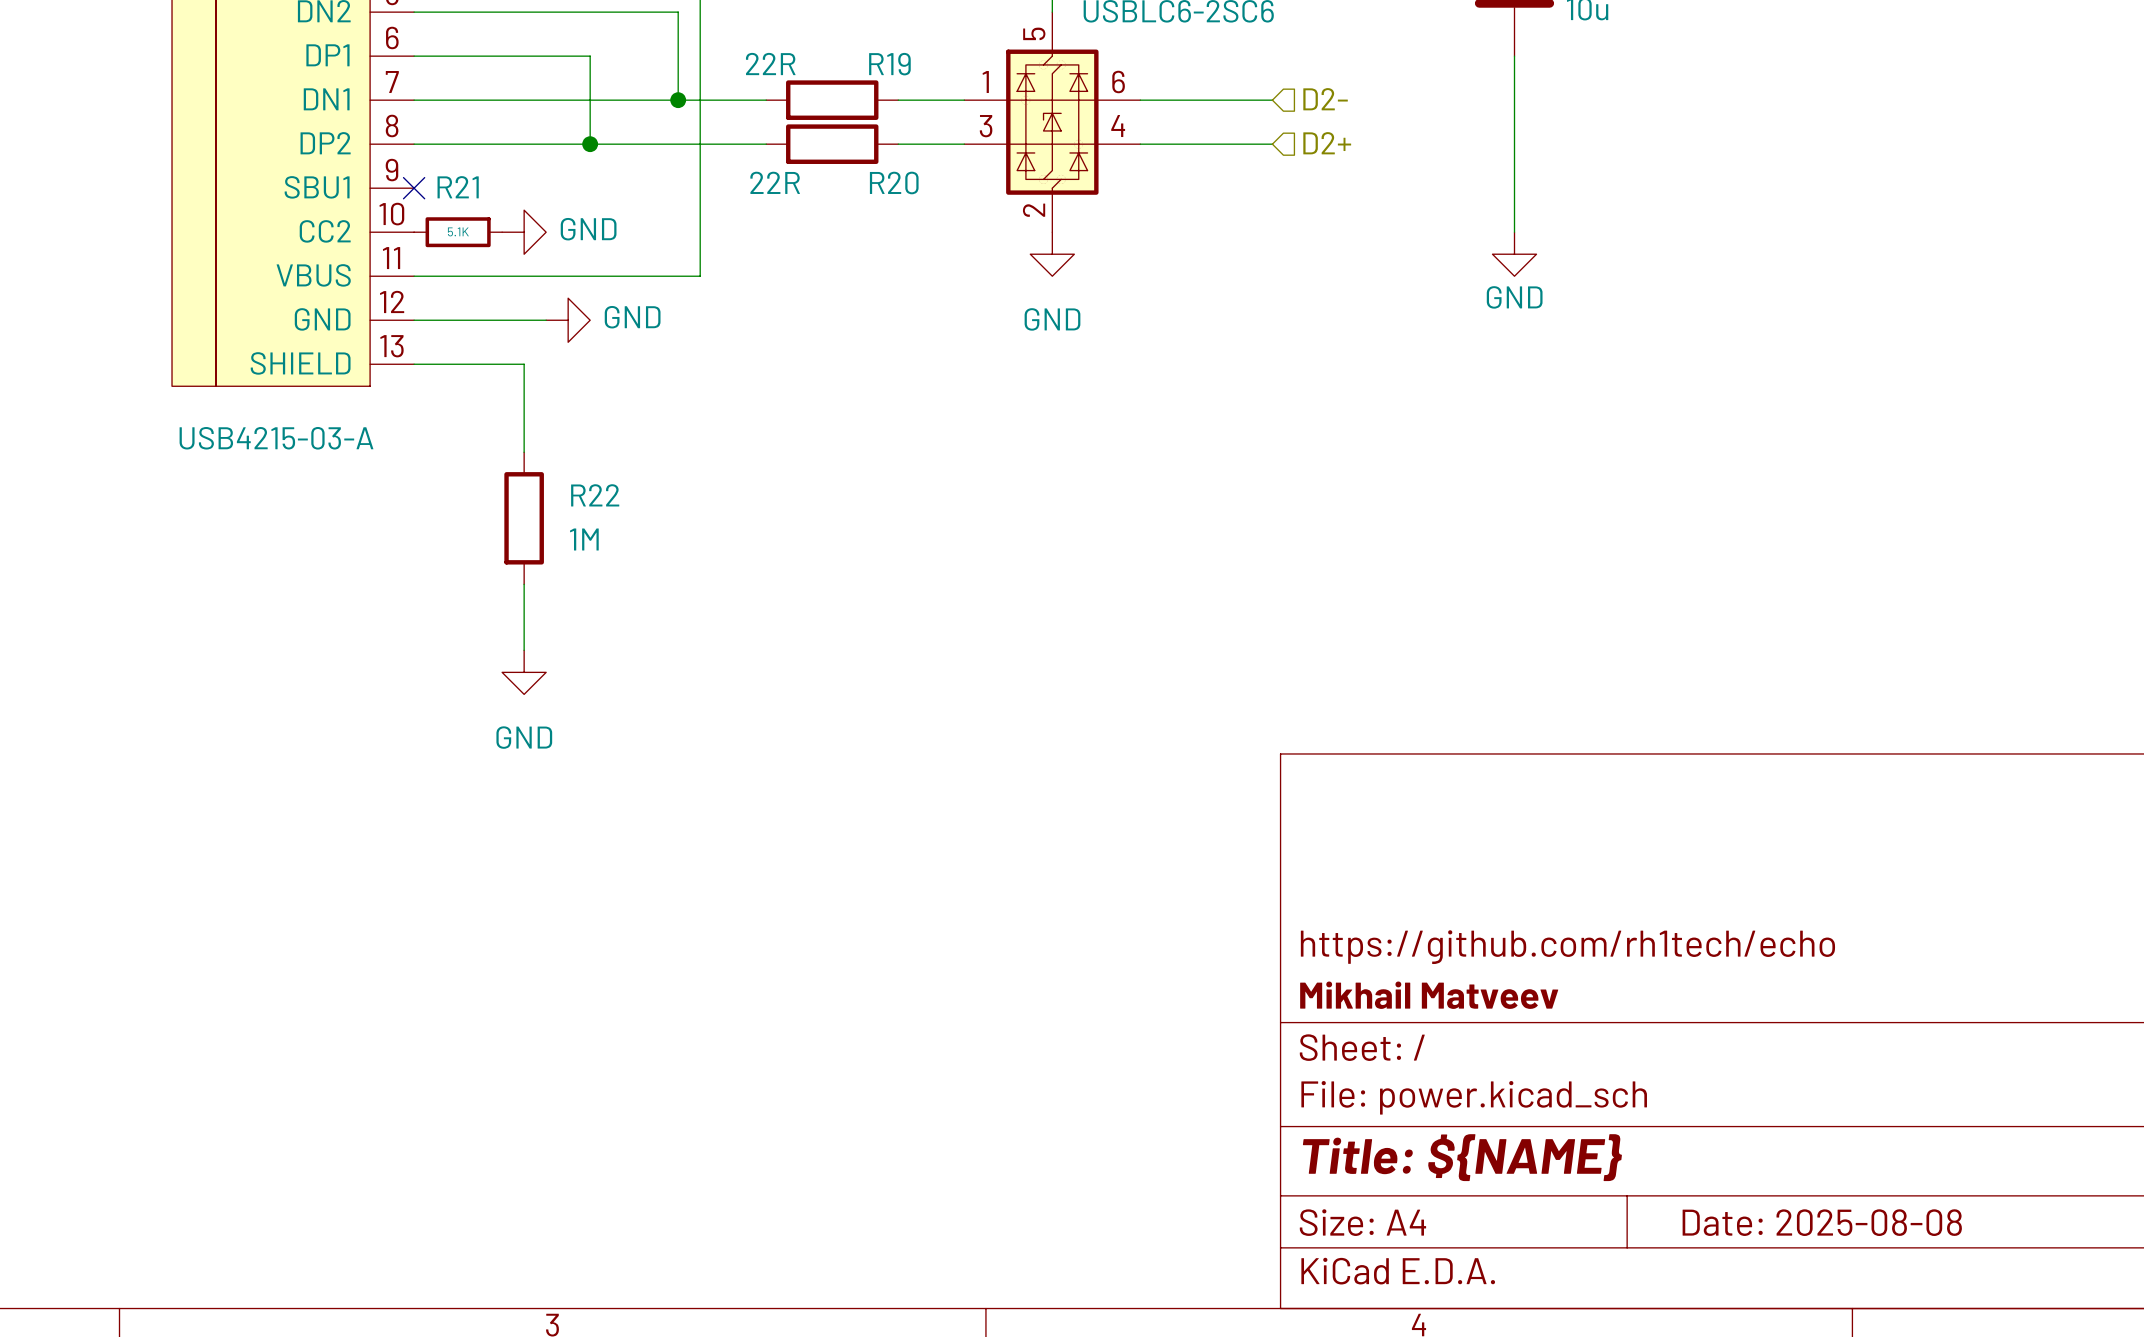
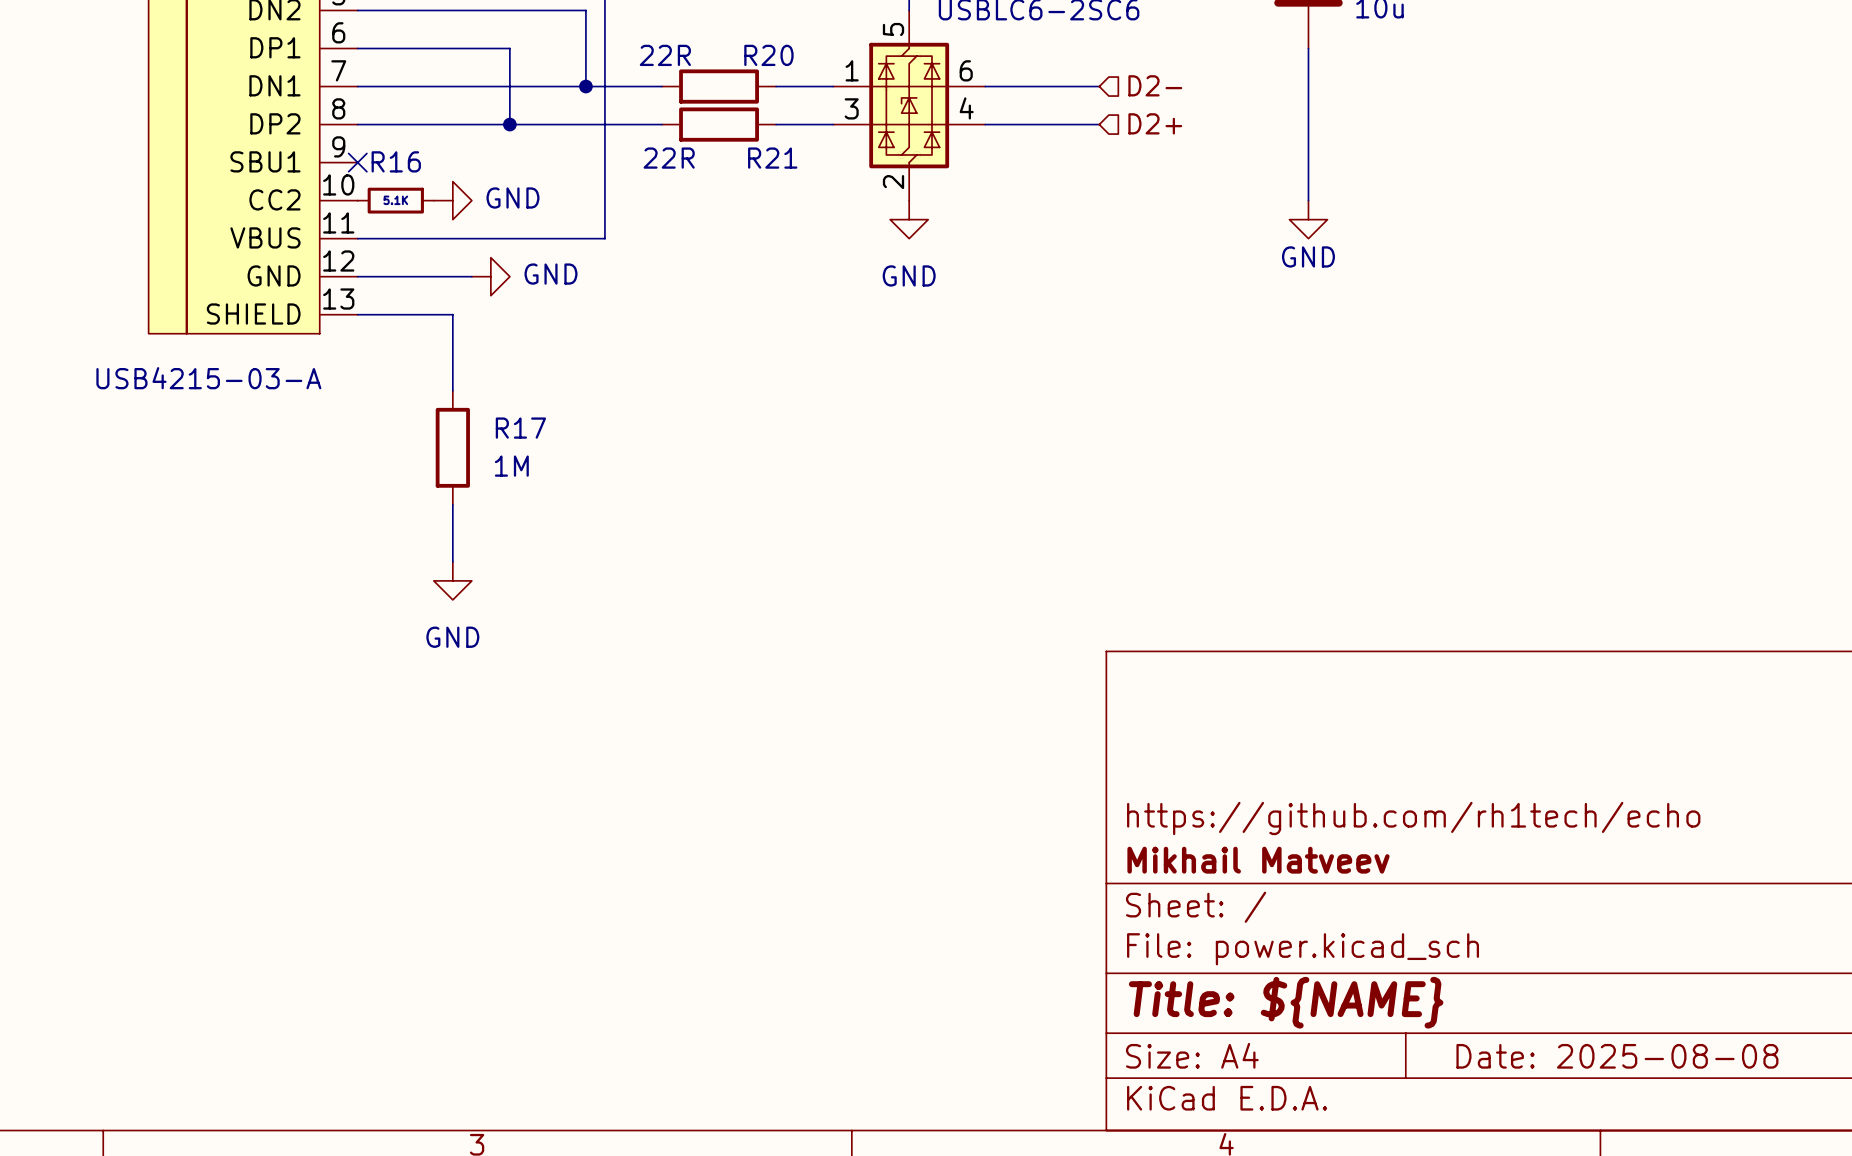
R19 name: R19 (889, 64) -> R20 (768, 55)
R20 name: R20 (894, 182) -> R21 (772, 158)
R21 name: R21 (458, 187) -> R16 (396, 161)
R22 name: R22 (595, 495) -> R17 (520, 428)

